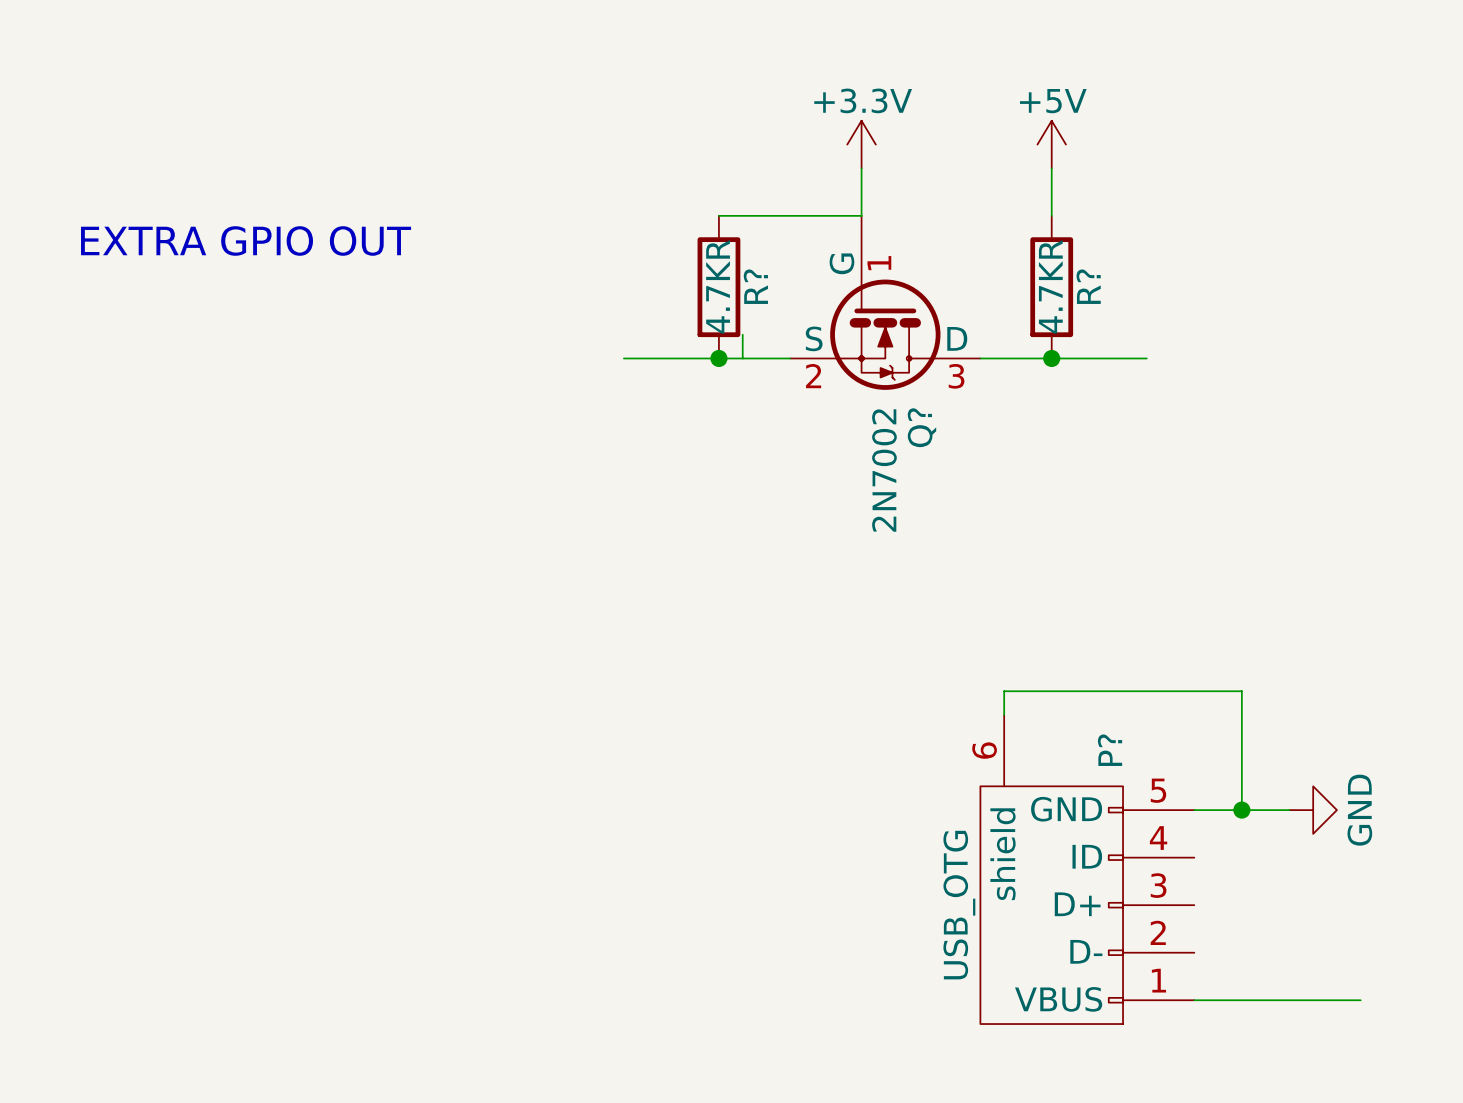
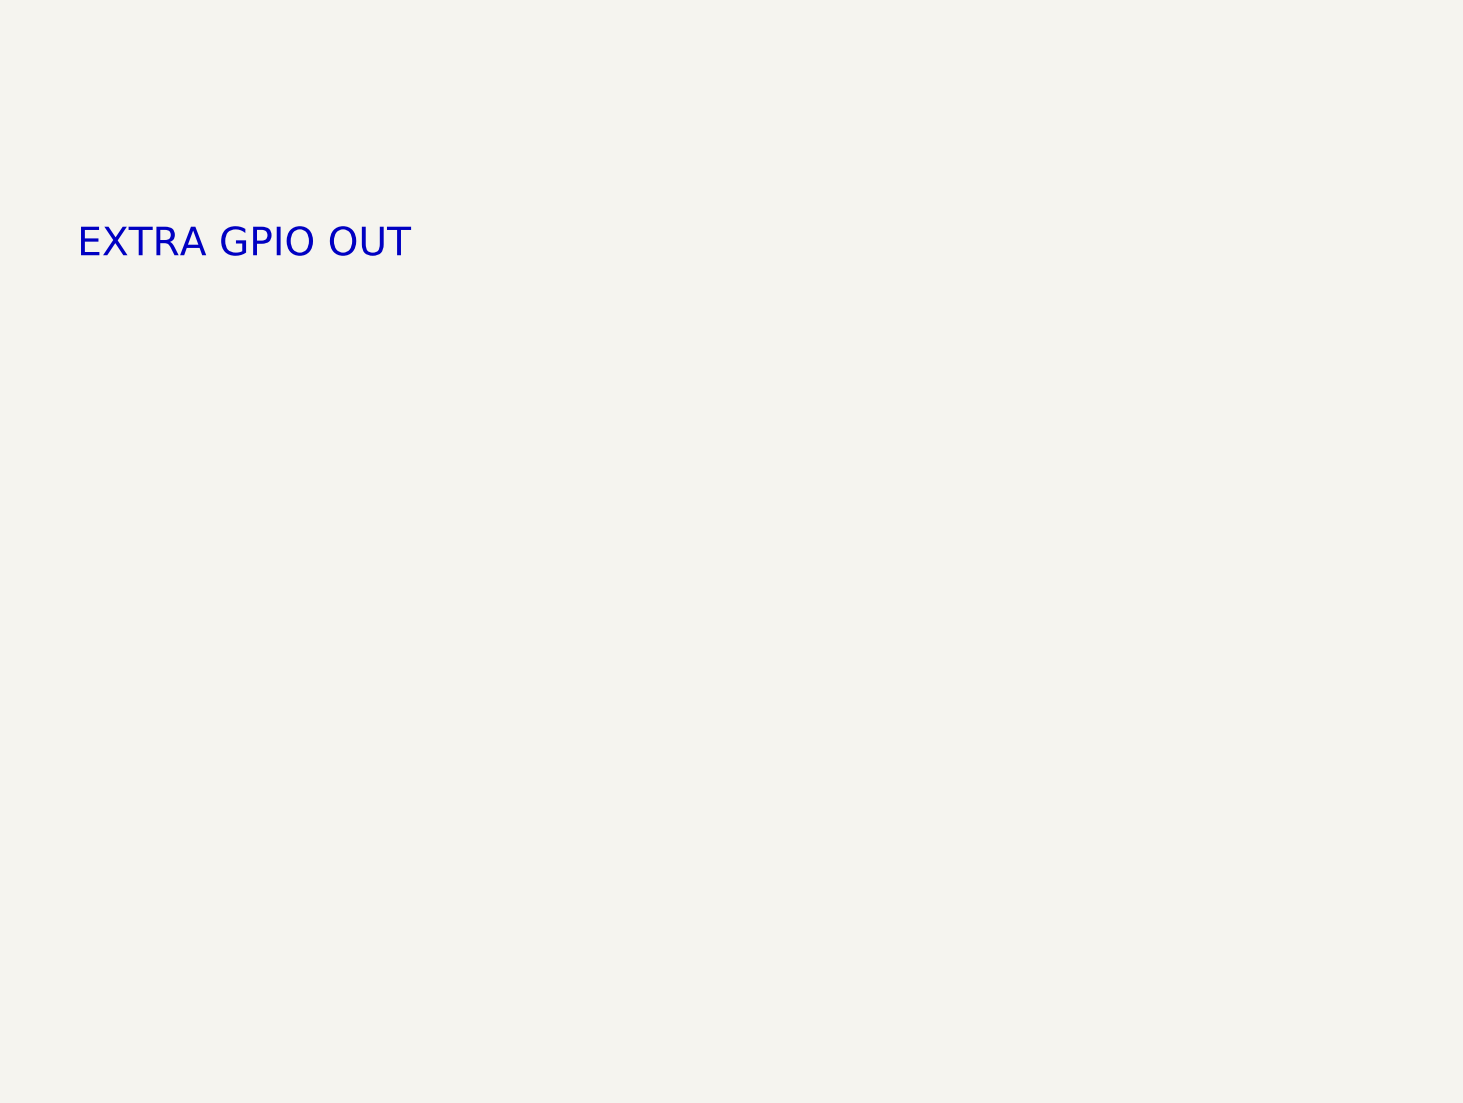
power symbol: +3.3V (861, 144) -> none
power symbol: +5V (1051, 144) -> none
wire: (861, 168) (861, 215) (718, 215) -> none
wire: (1051, 168) (1051, 215) -> none
R?: 4.7KR (718, 287) -> none
R?: 4.7KR (1051, 287) -> none
Q?: 2N7002 (885, 302) -> none
wire: (742, 334) (742, 358) -> none
wire: (623, 358) (790, 358) -> none
junction: (718, 358) -> none
wire: (980, 358) (1146, 358) -> none
junction: (1051, 358) -> none
wire: (1004, 715) (1004, 691) (1241, 691) (1241, 810) -> none
wire: (1194, 810) (1289, 810) -> none
junction: (1241, 810) -> none
power symbol: GND (1313, 810) -> none
P?: USB_OTG (1087, 869) -> none
wire: (1194, 1000) (1360, 1000) -> none

